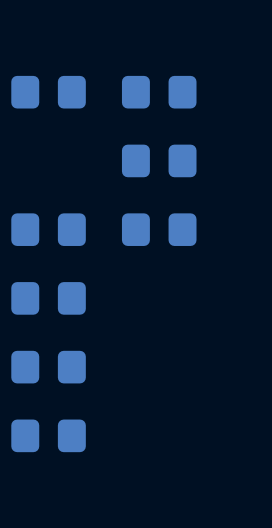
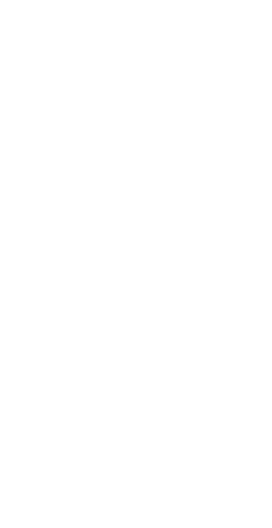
part: (48, 92) -> none
part: (159, 92) -> none
part: (159, 160) -> none
part: (48, 229) -> none
part: (159, 229) -> none
part: (48, 298) -> none
part: (48, 367) -> none
part: (48, 435) -> none

